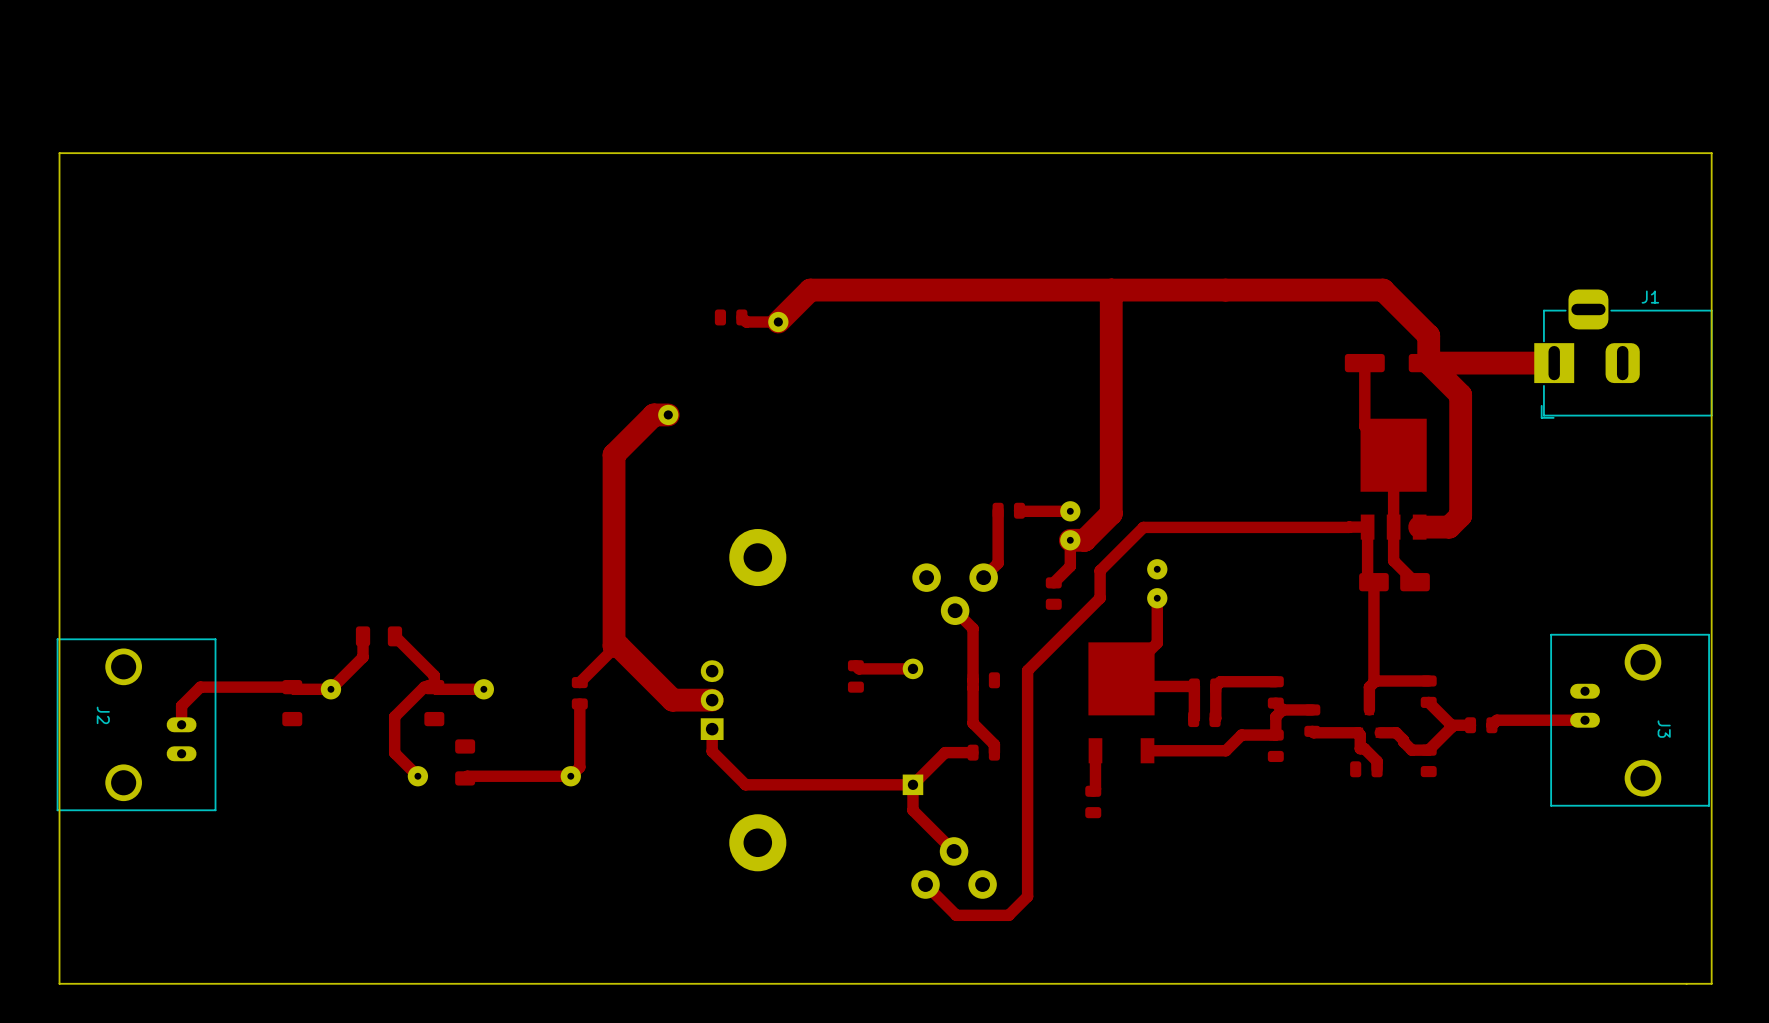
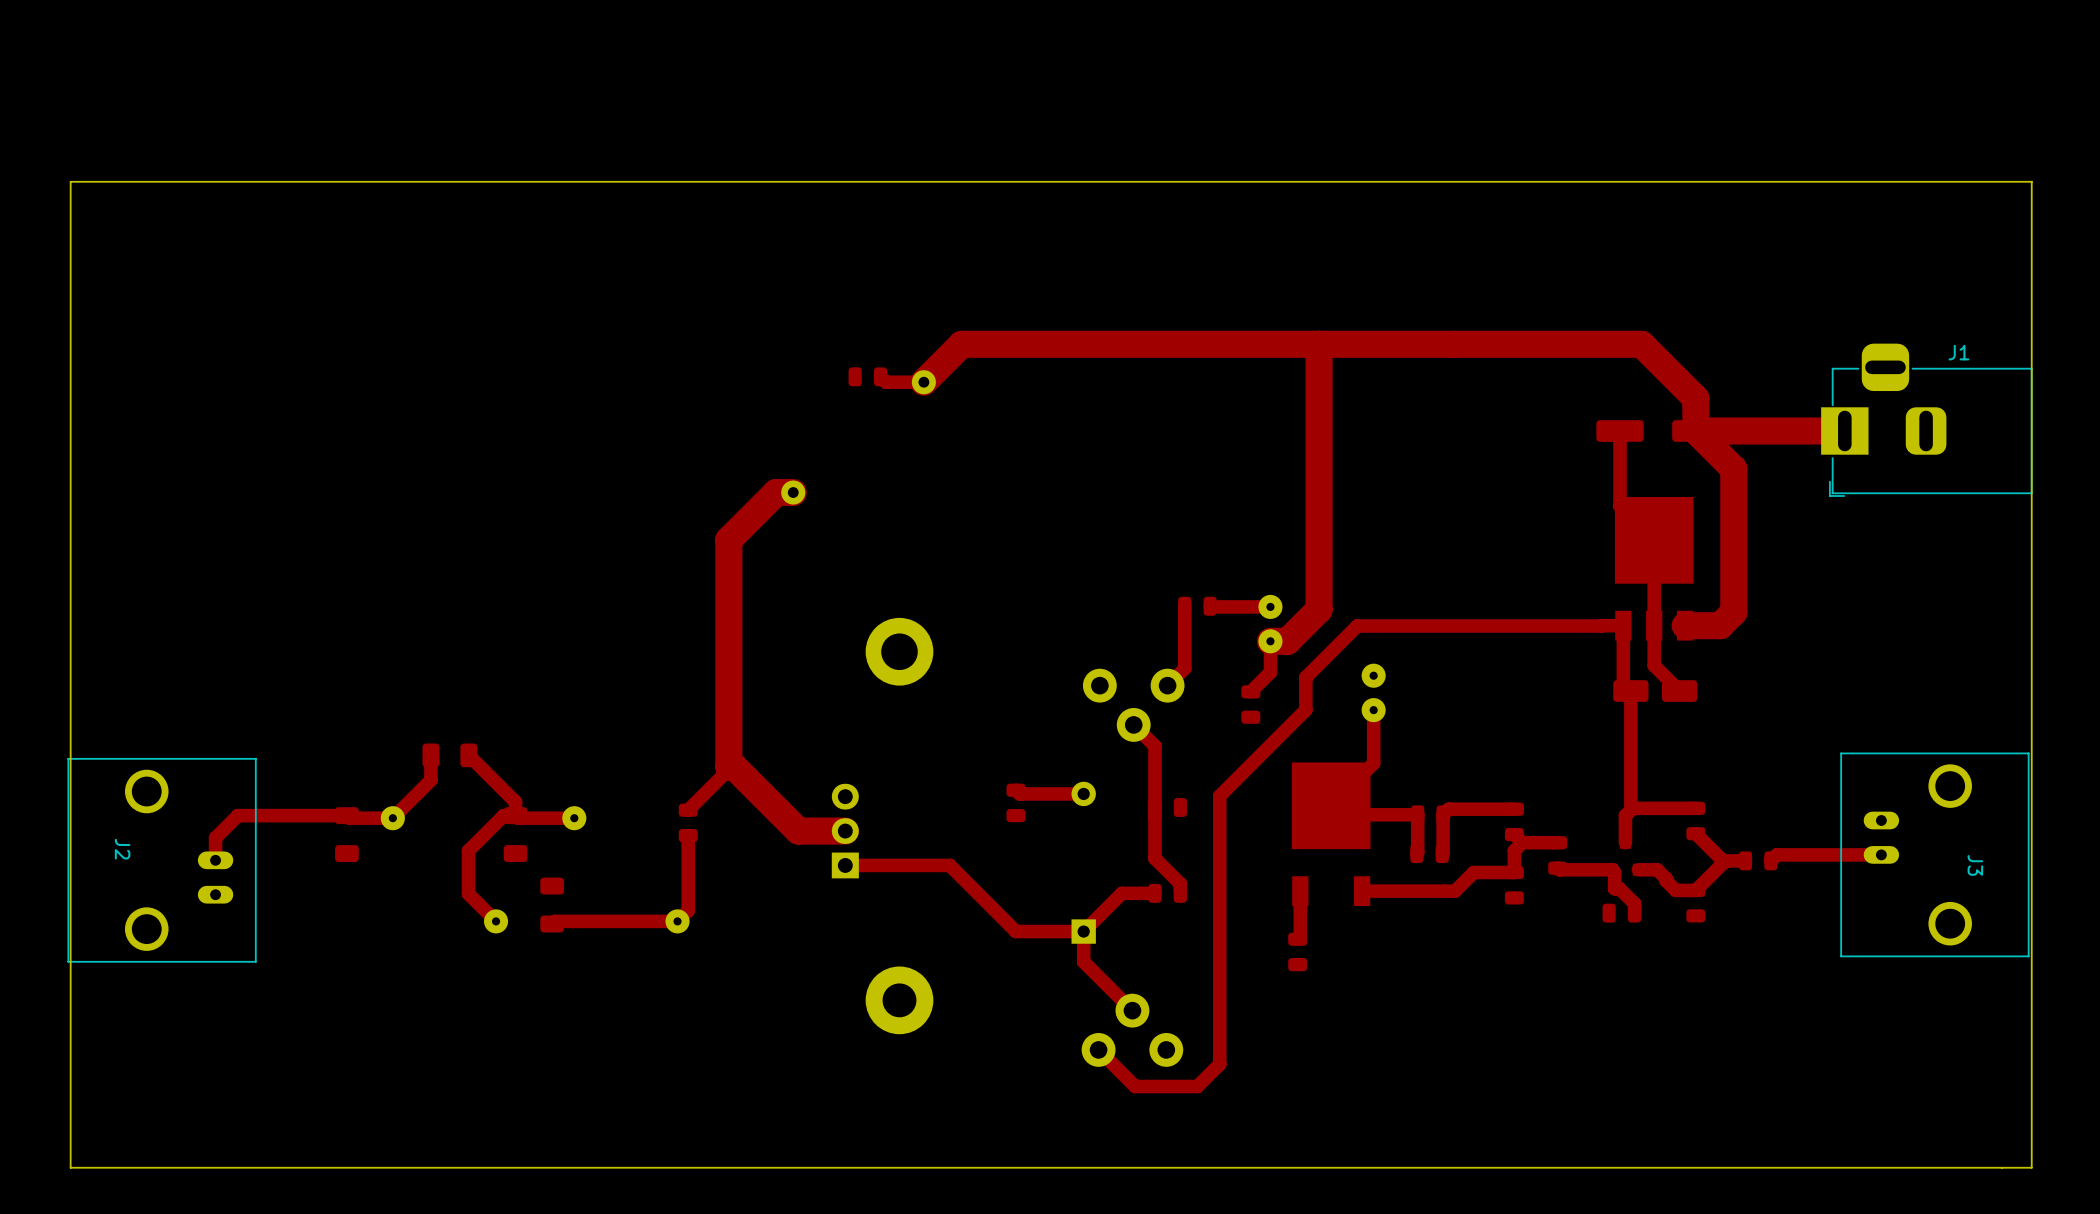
part footprint: [729, 529, 787, 587] -> [865, 617, 934, 686]
top track: (712, 729) (712, 751) (745, 784) (855, 784) -> (845, 865) (949, 865) (1015, 931)

